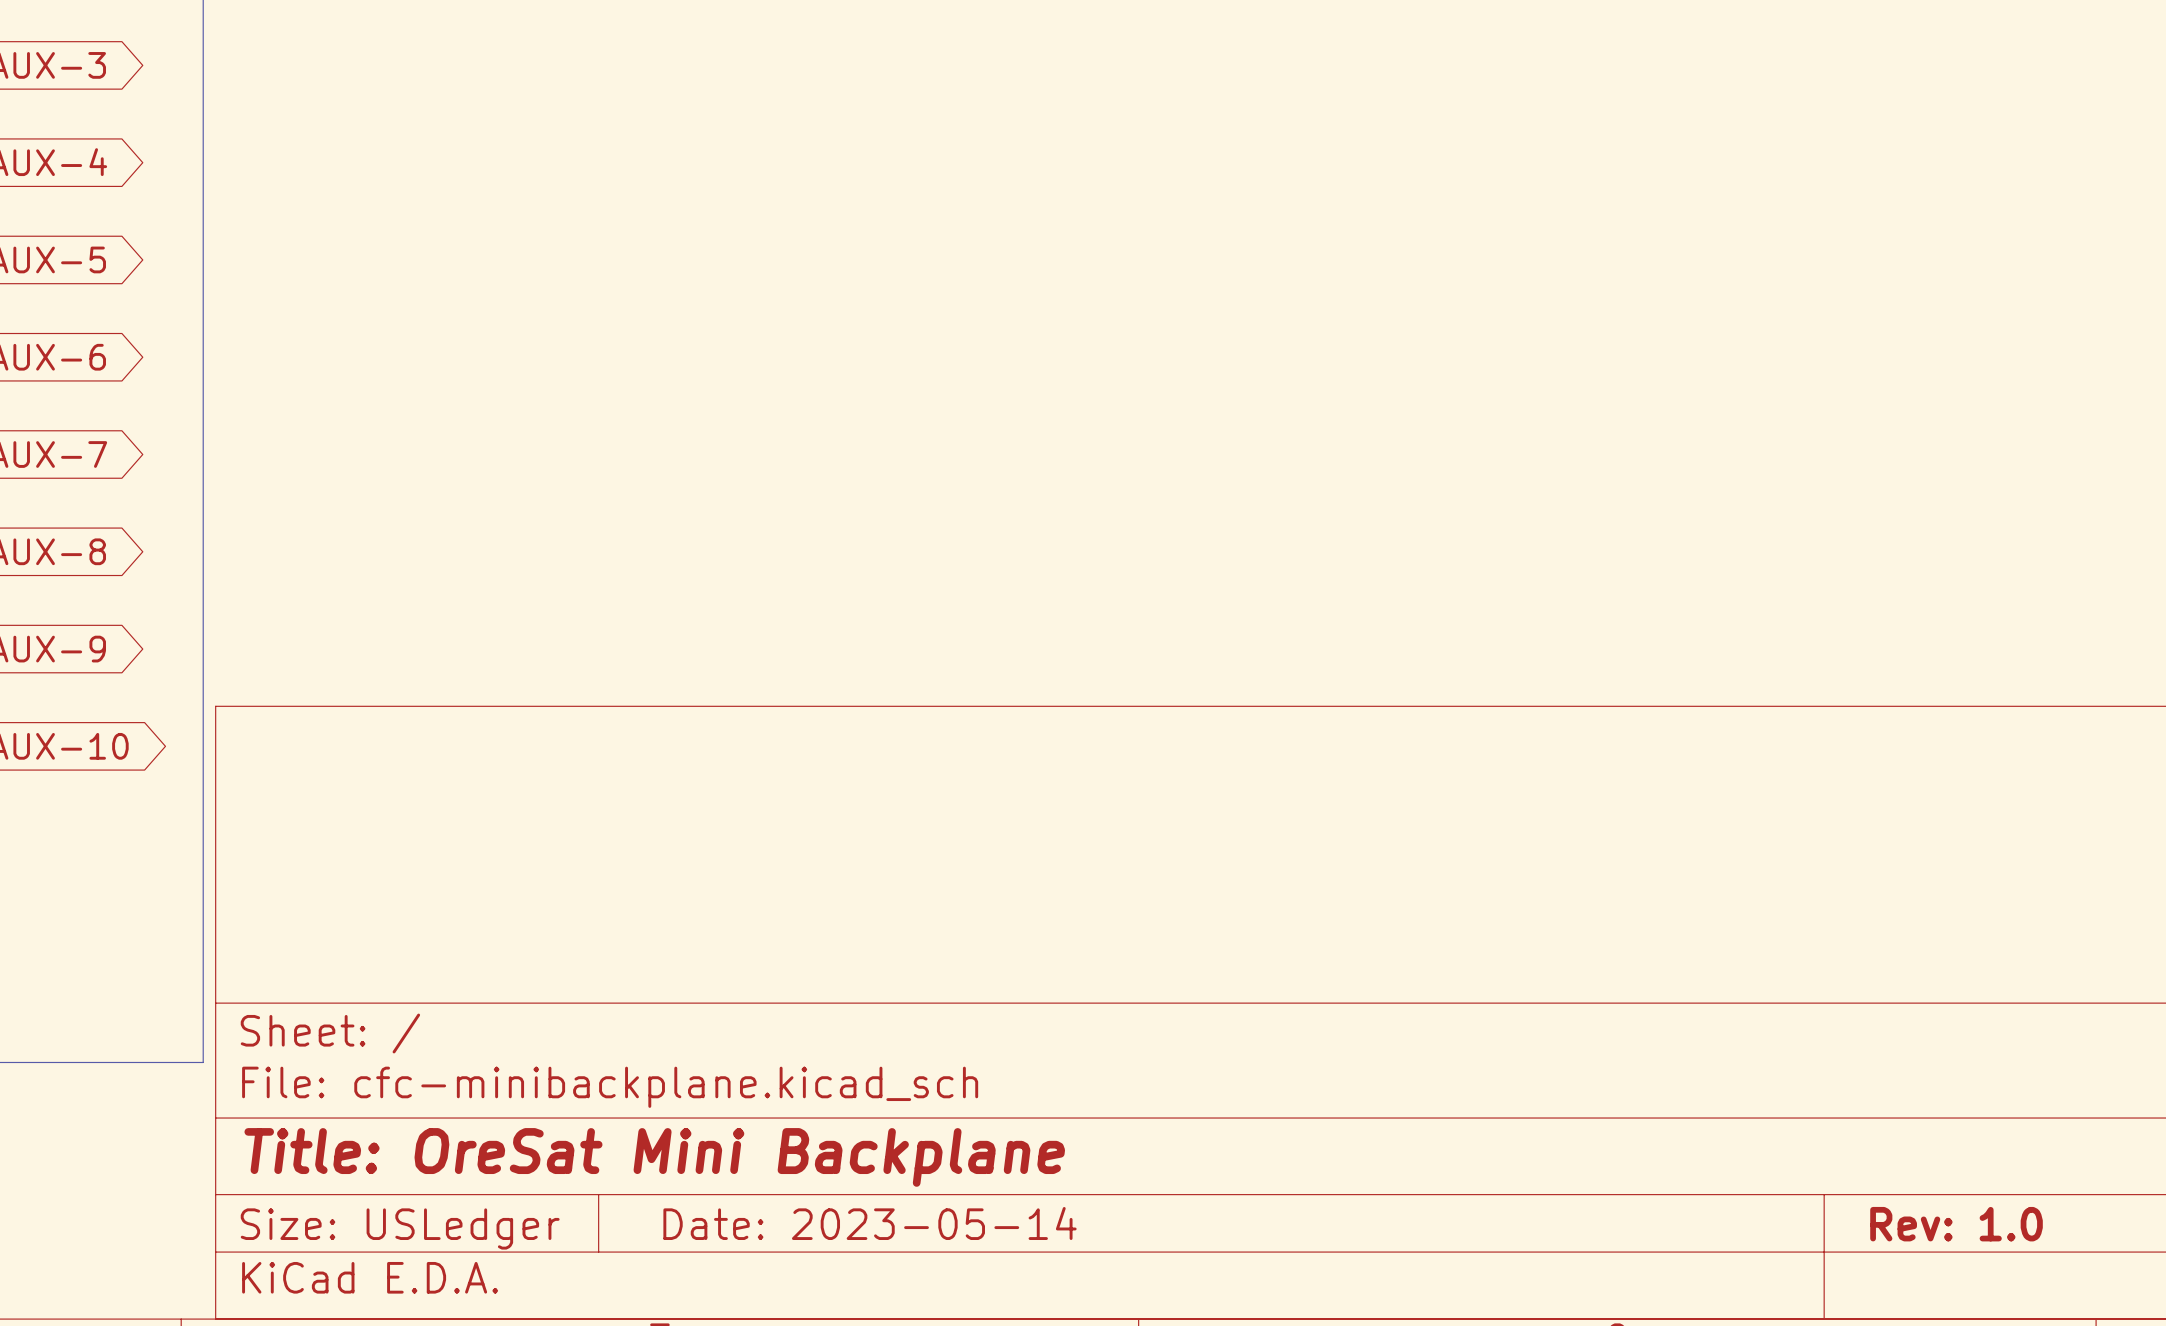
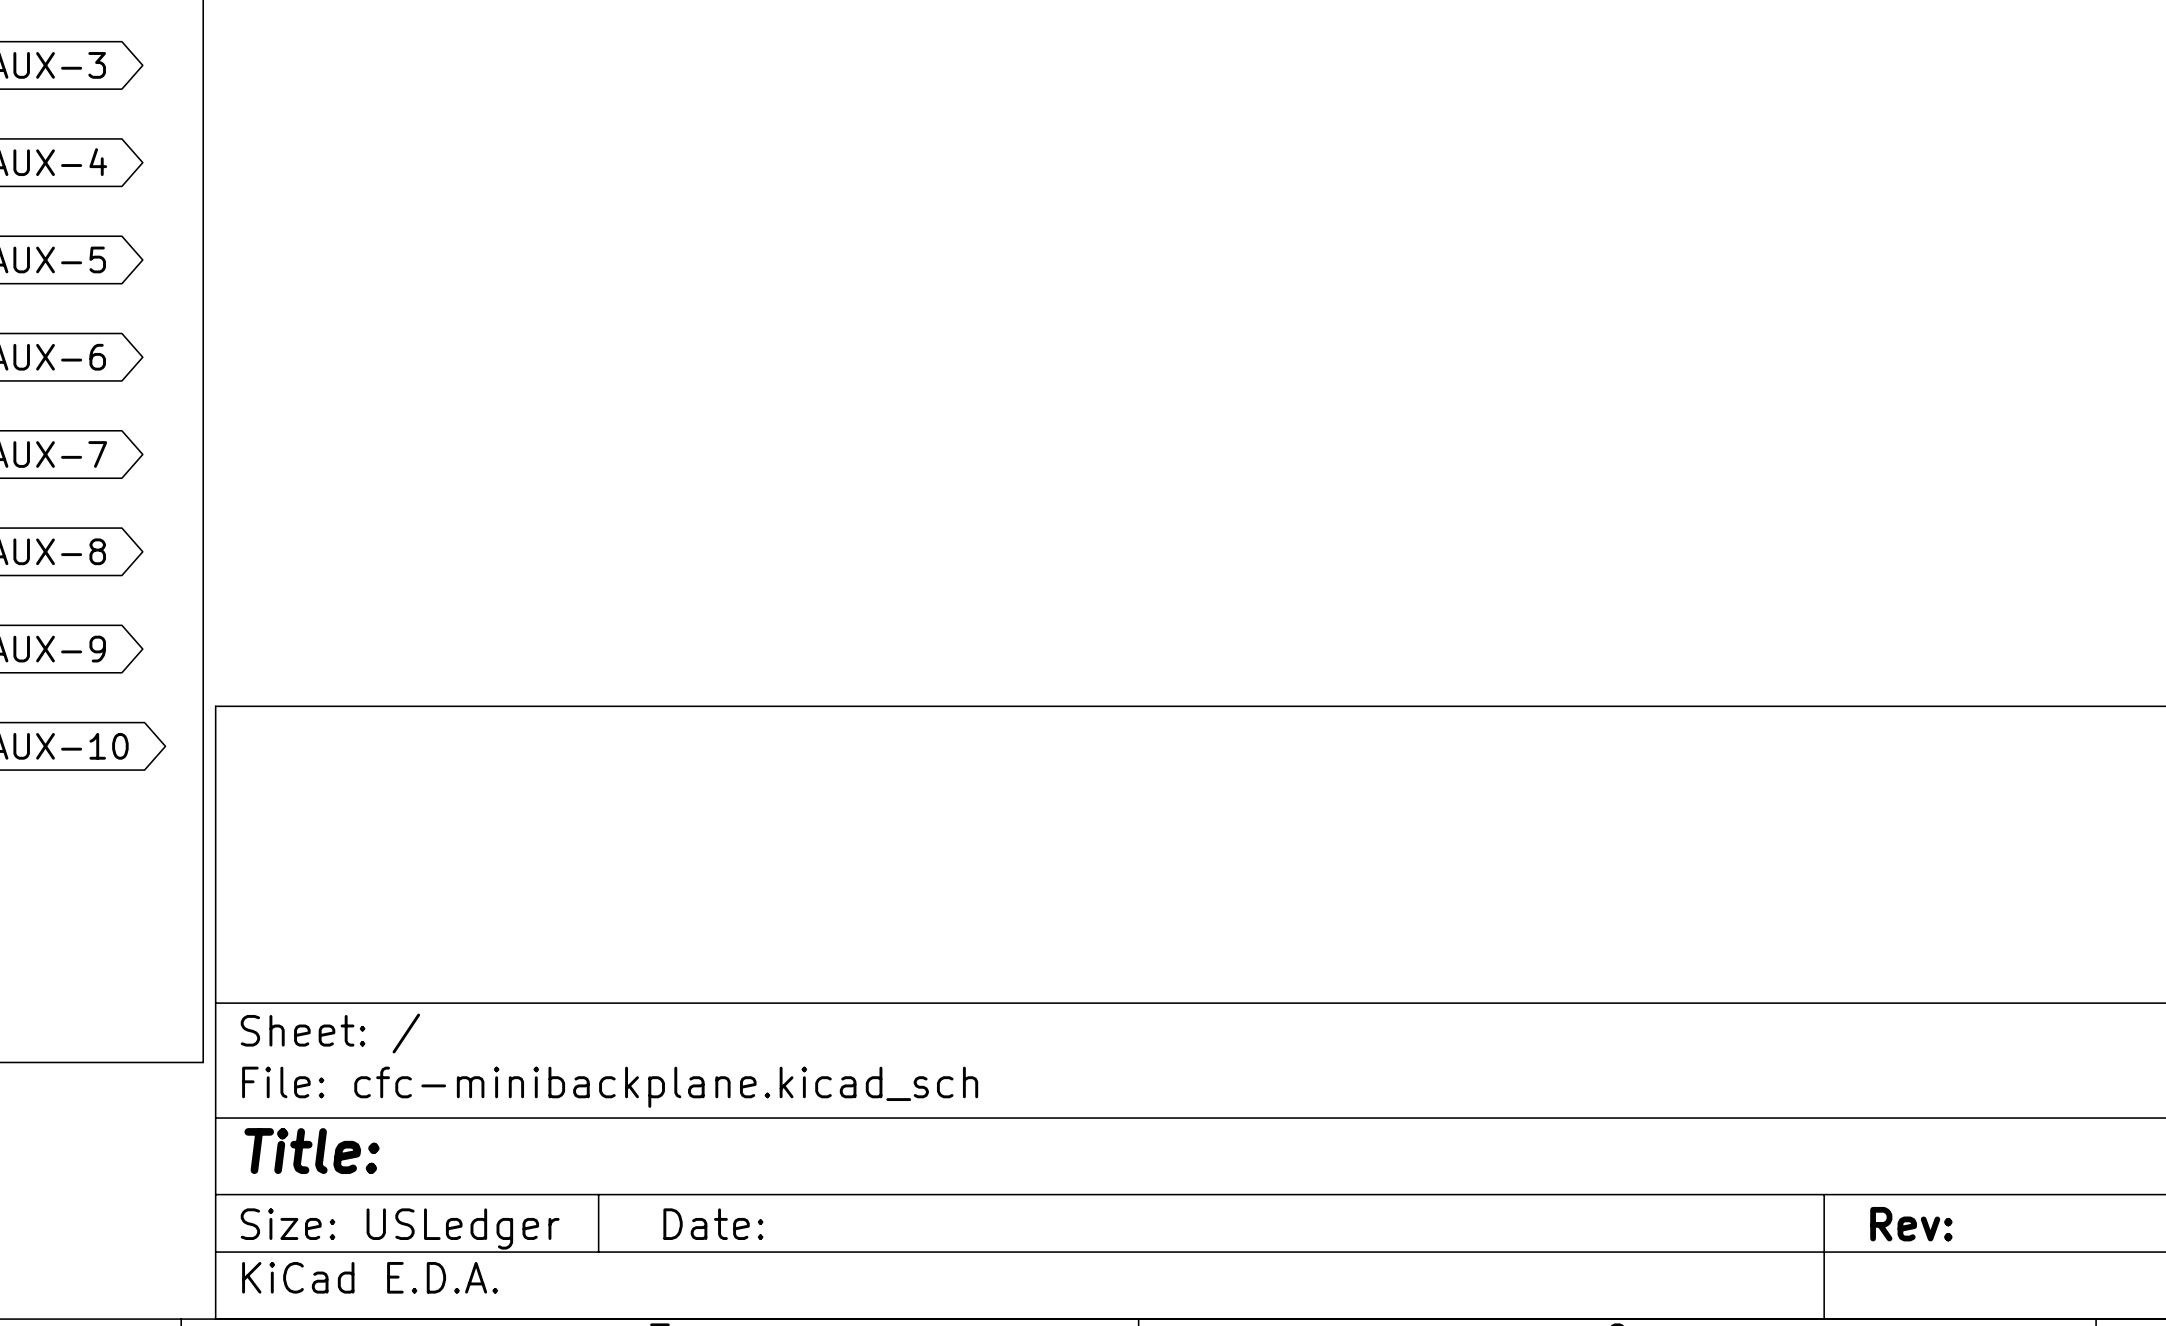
title block: Title: OreSat Mini Backplane (654, 1157) -> Title: (312, 1151)
title block: Date: 2023-05-14 (870, 1223) -> Date: (713, 1224)
title block: Rev: 1.0 (1956, 1224) -> Rev: (1911, 1224)

